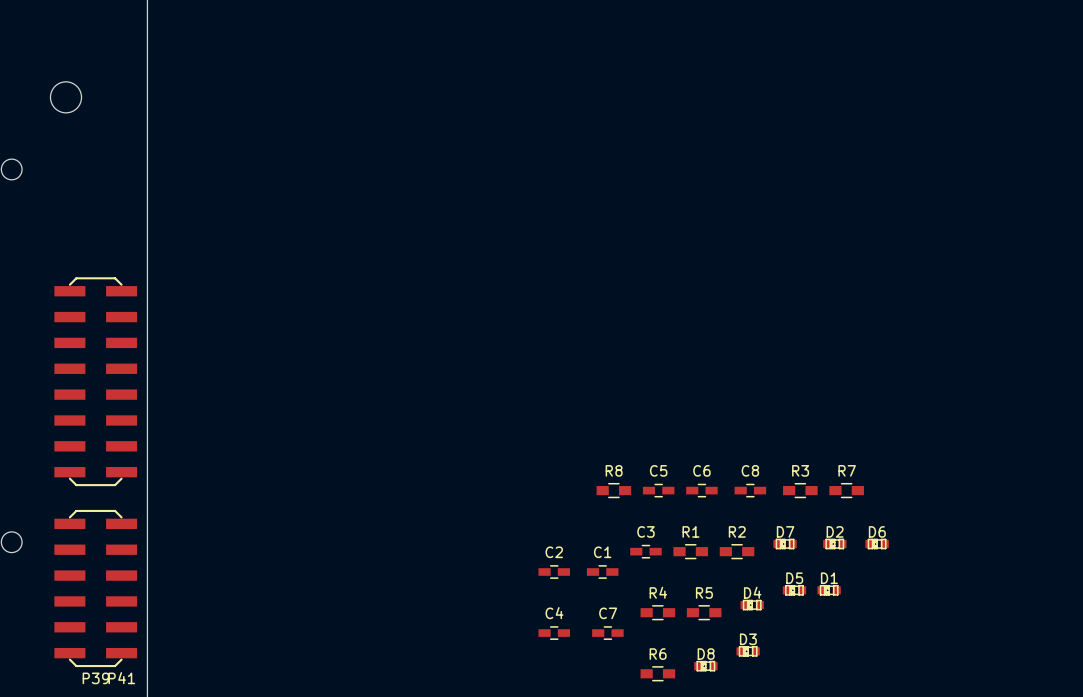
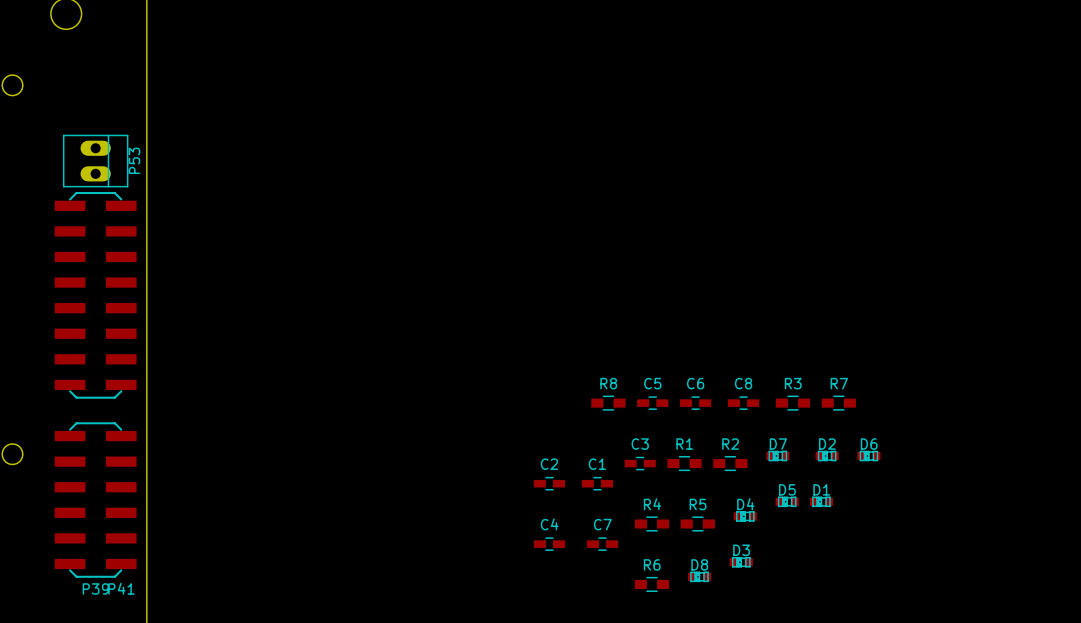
P53: none -> (95, 161)

